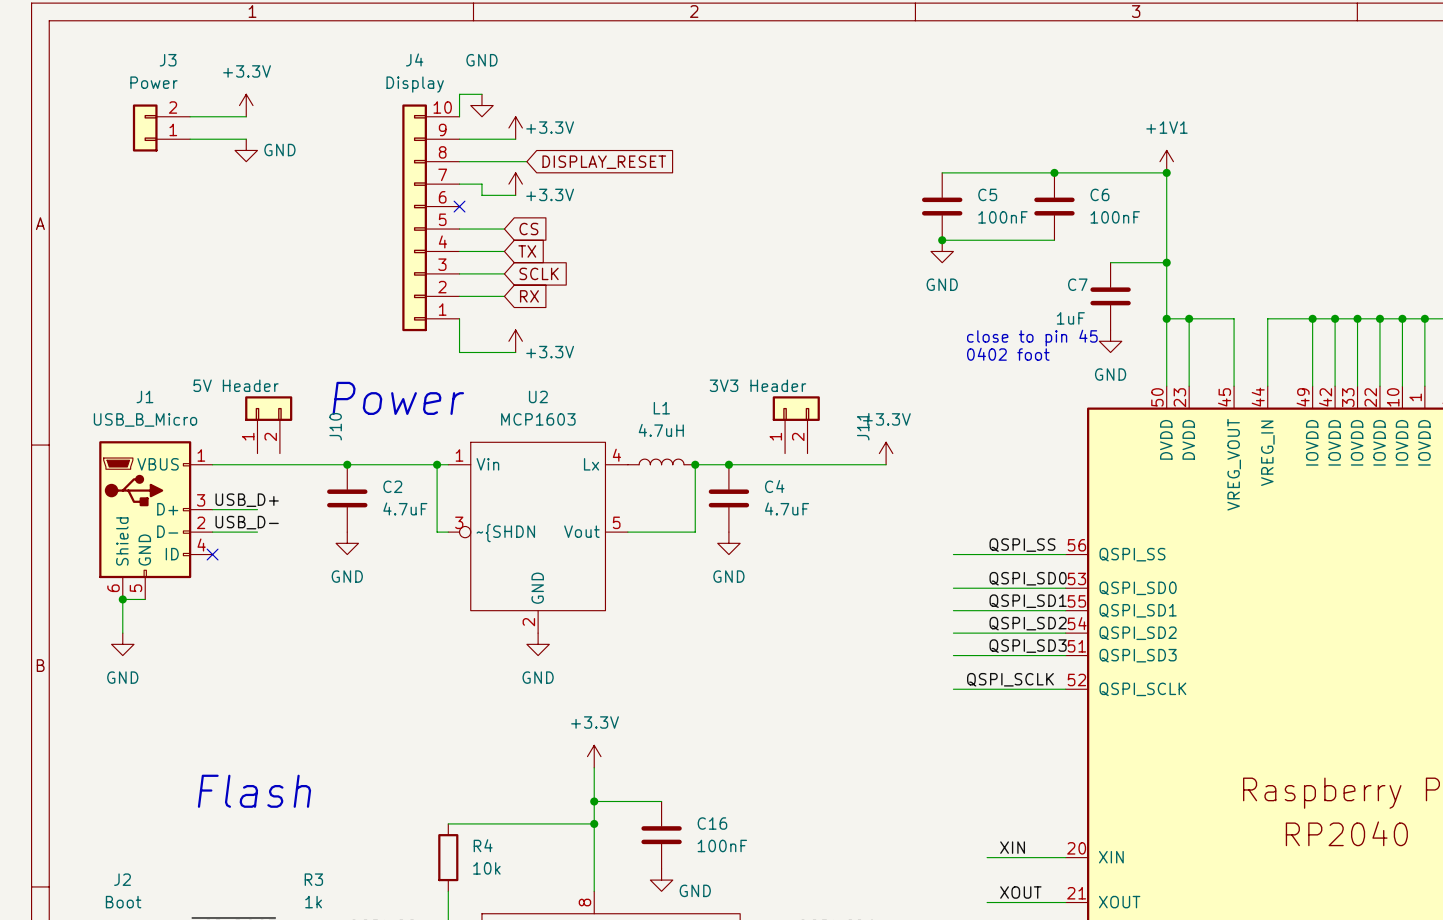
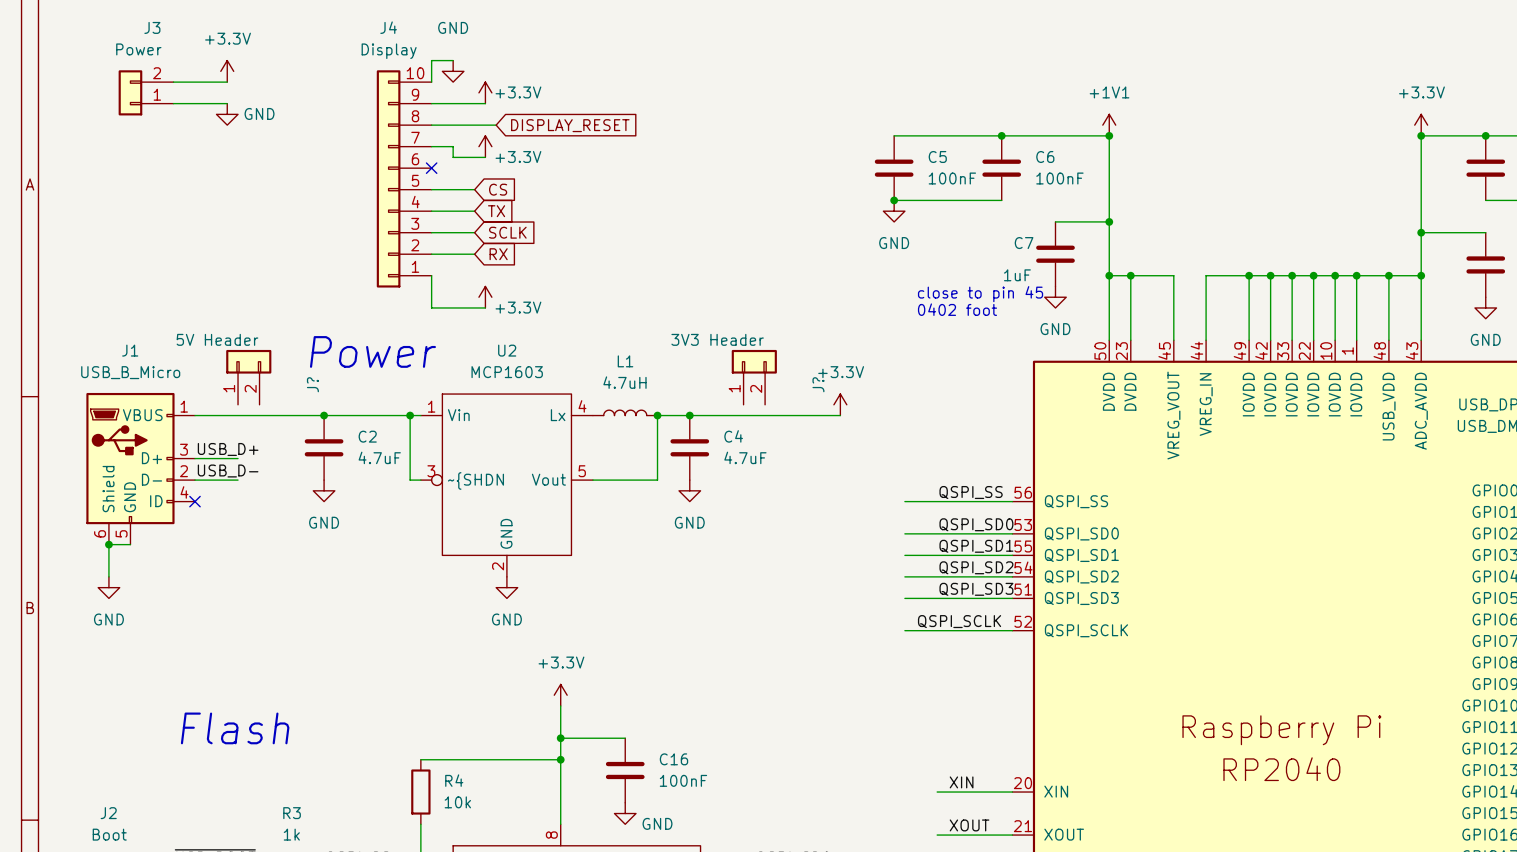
J10 name: J10 (335, 426) -> J? (312, 384)
J11 name: J11 (863, 426) -> J? (818, 384)

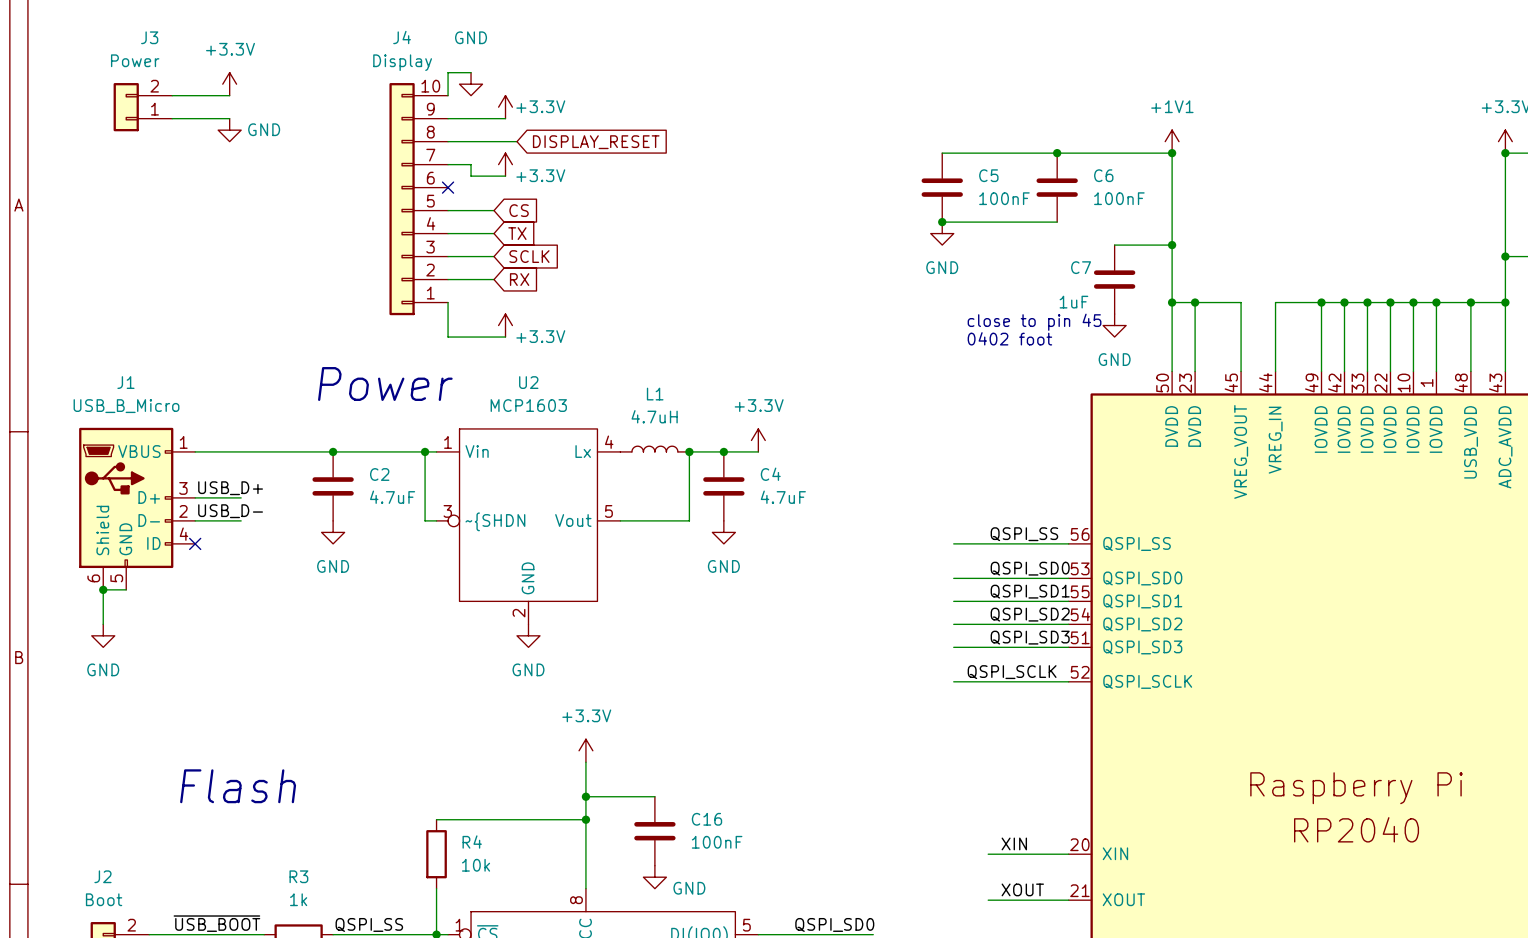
J?: 5V Header (248, 377) -> none
J?: 3V3 Header (754, 377) -> none
power symbol position: +3.3V (840, 404) -> +3.3V (758, 440)
wire: (722, 415) (840, 415) -> none

